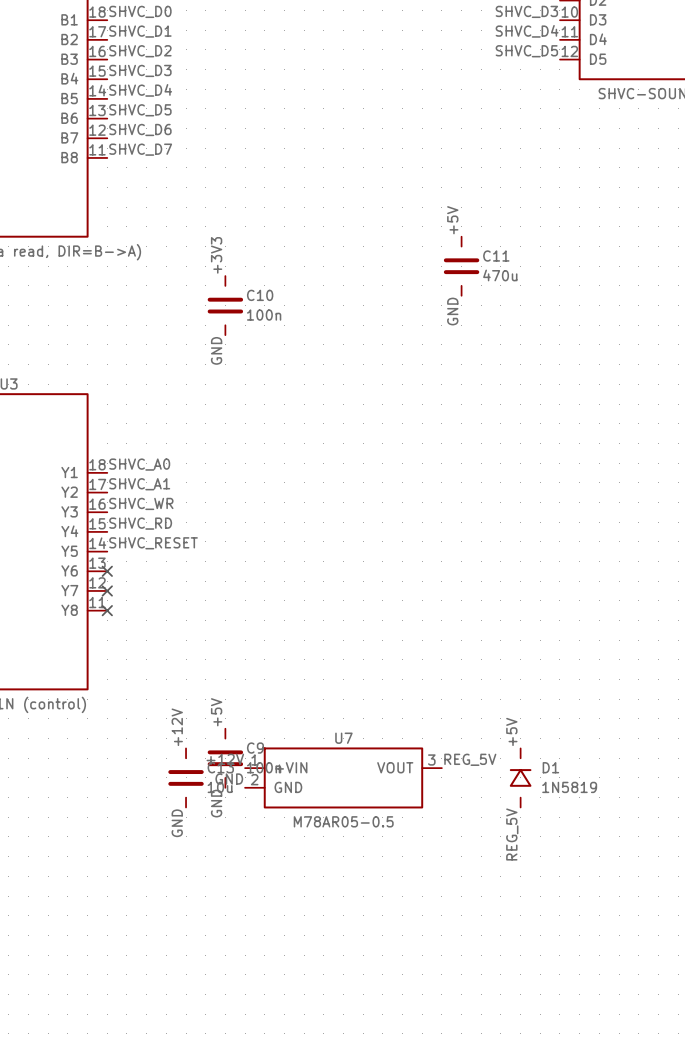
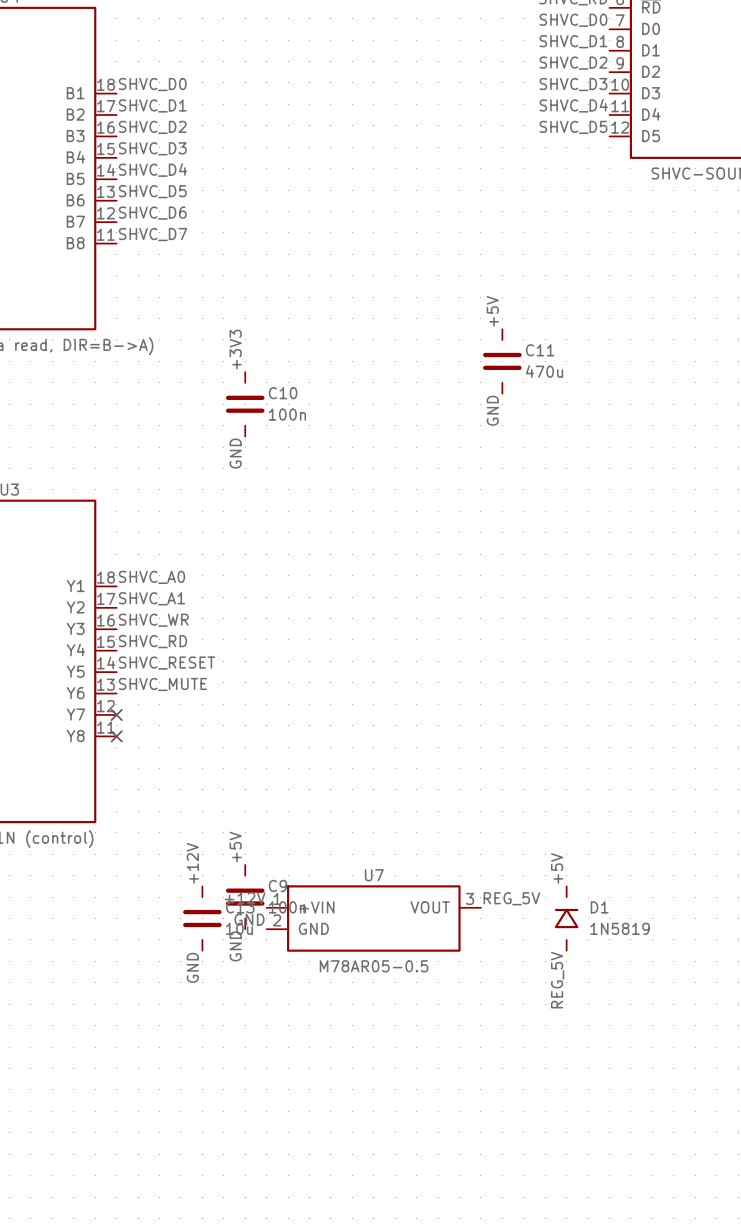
label: none -> SHVC_MUTE (162, 684)
no-connect mark: (107, 571) -> none

